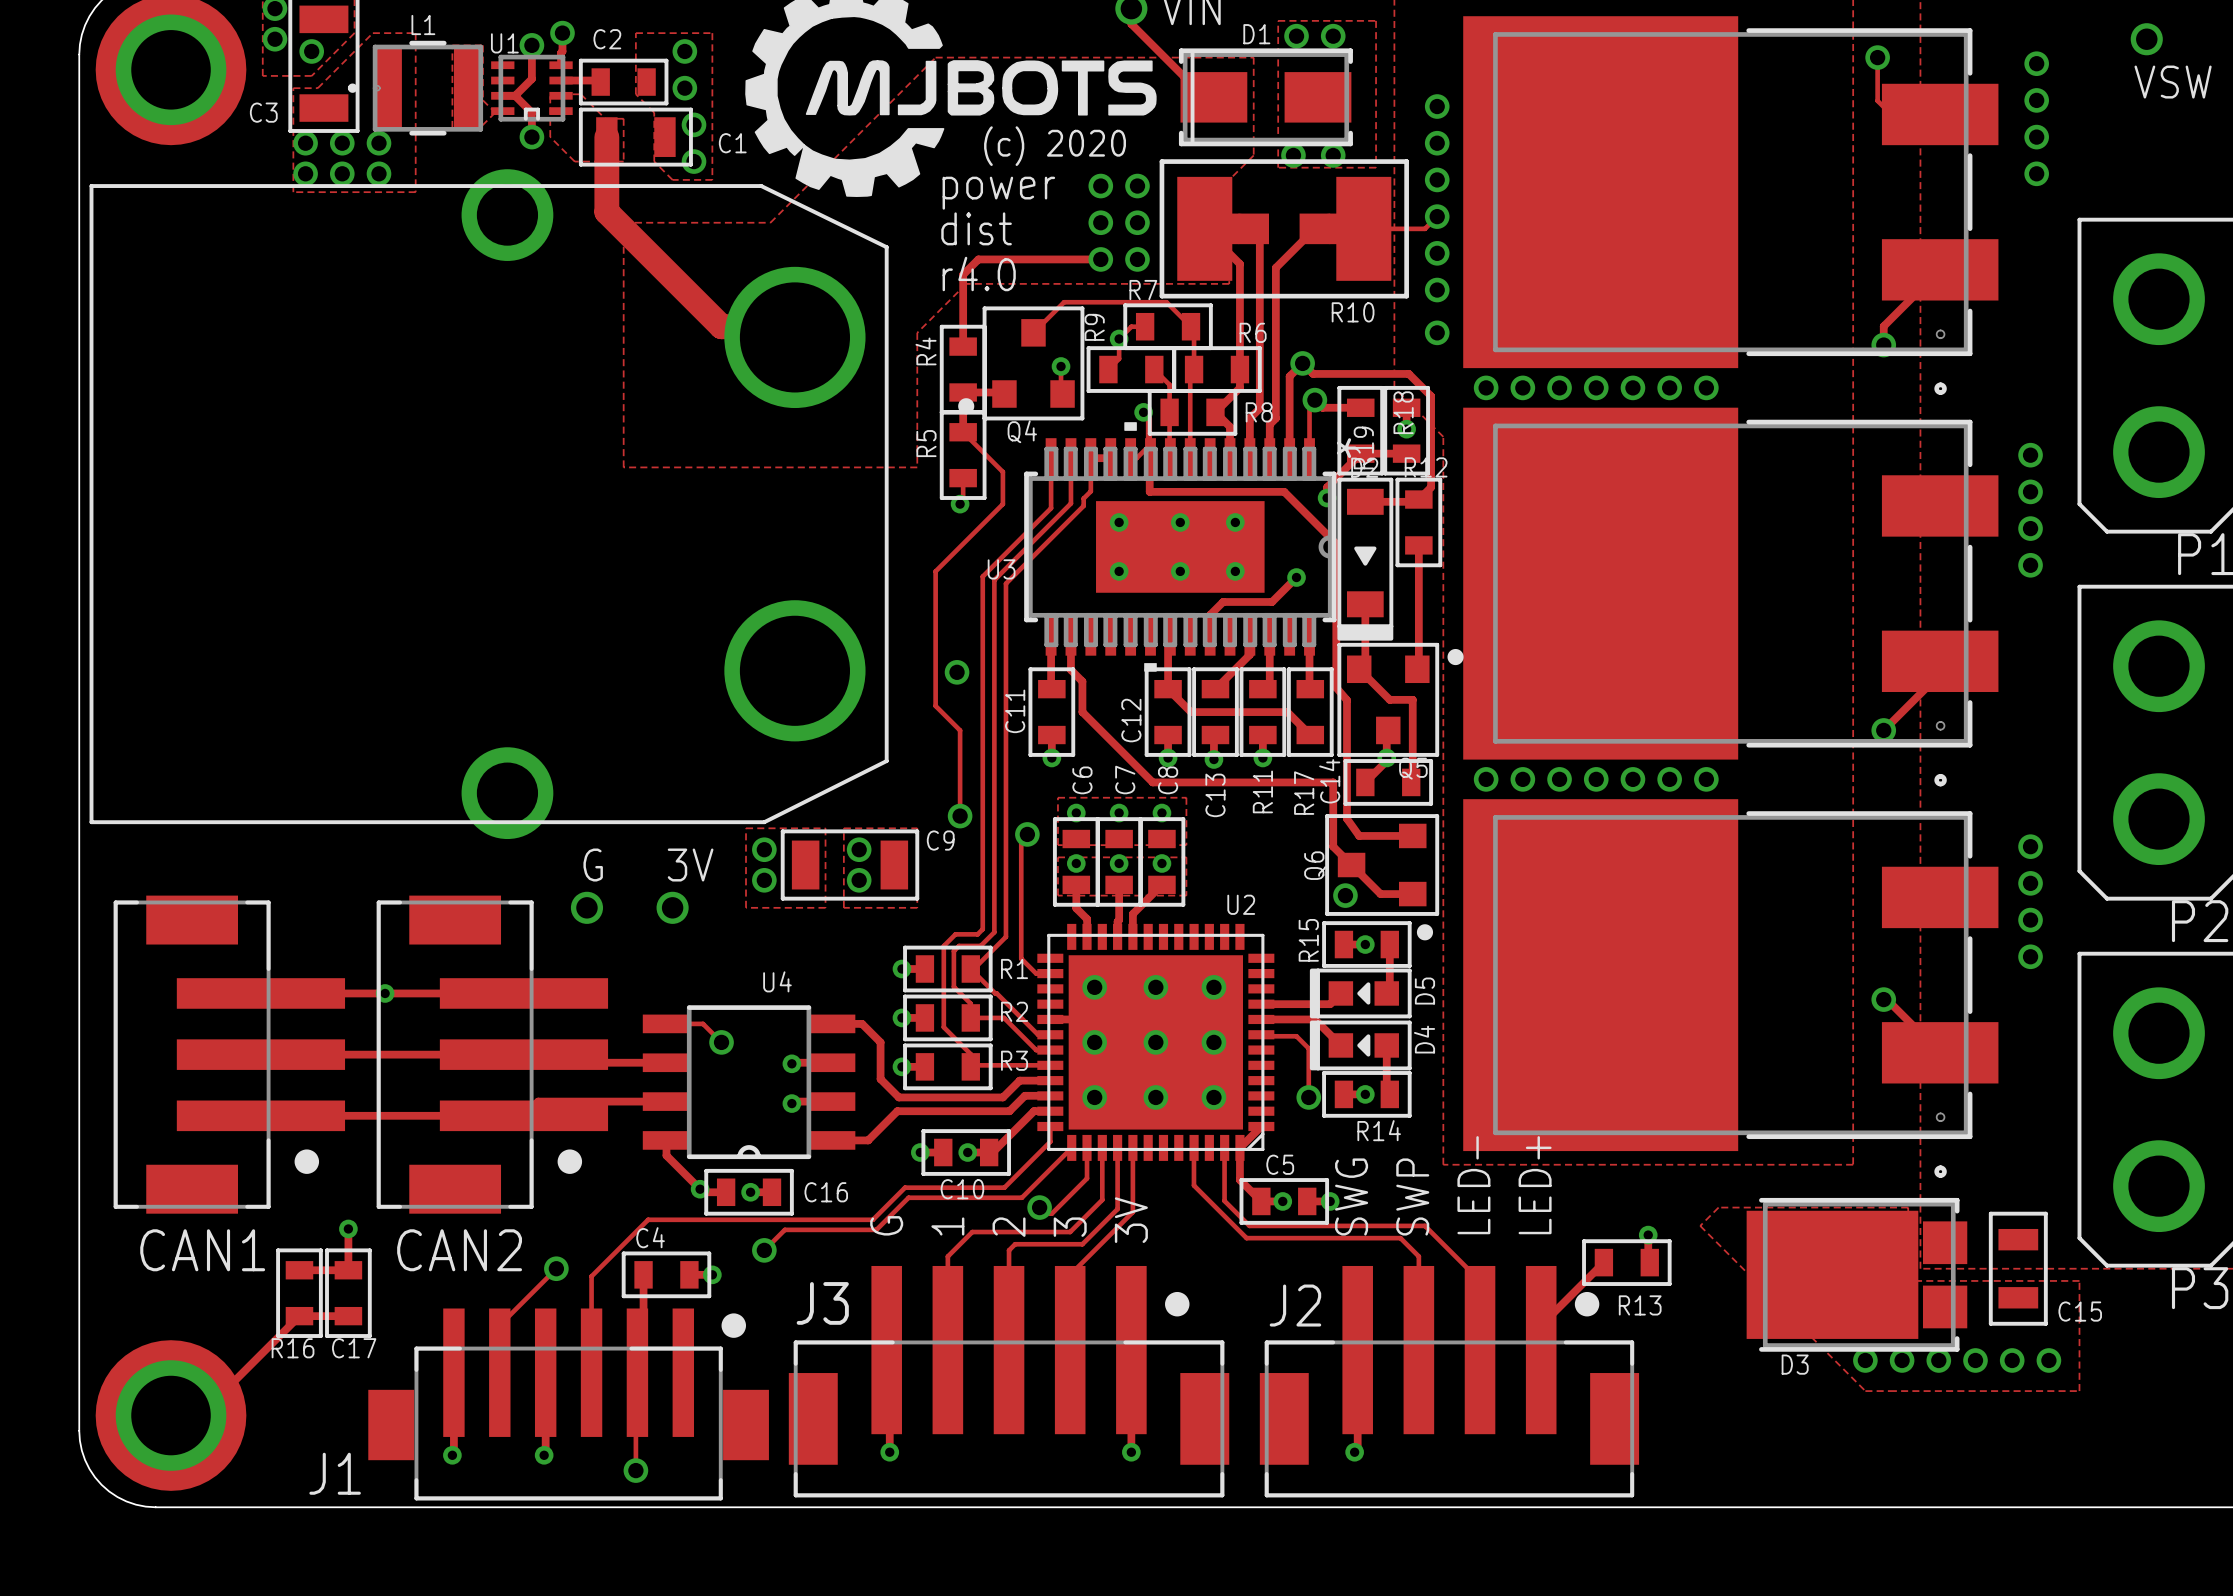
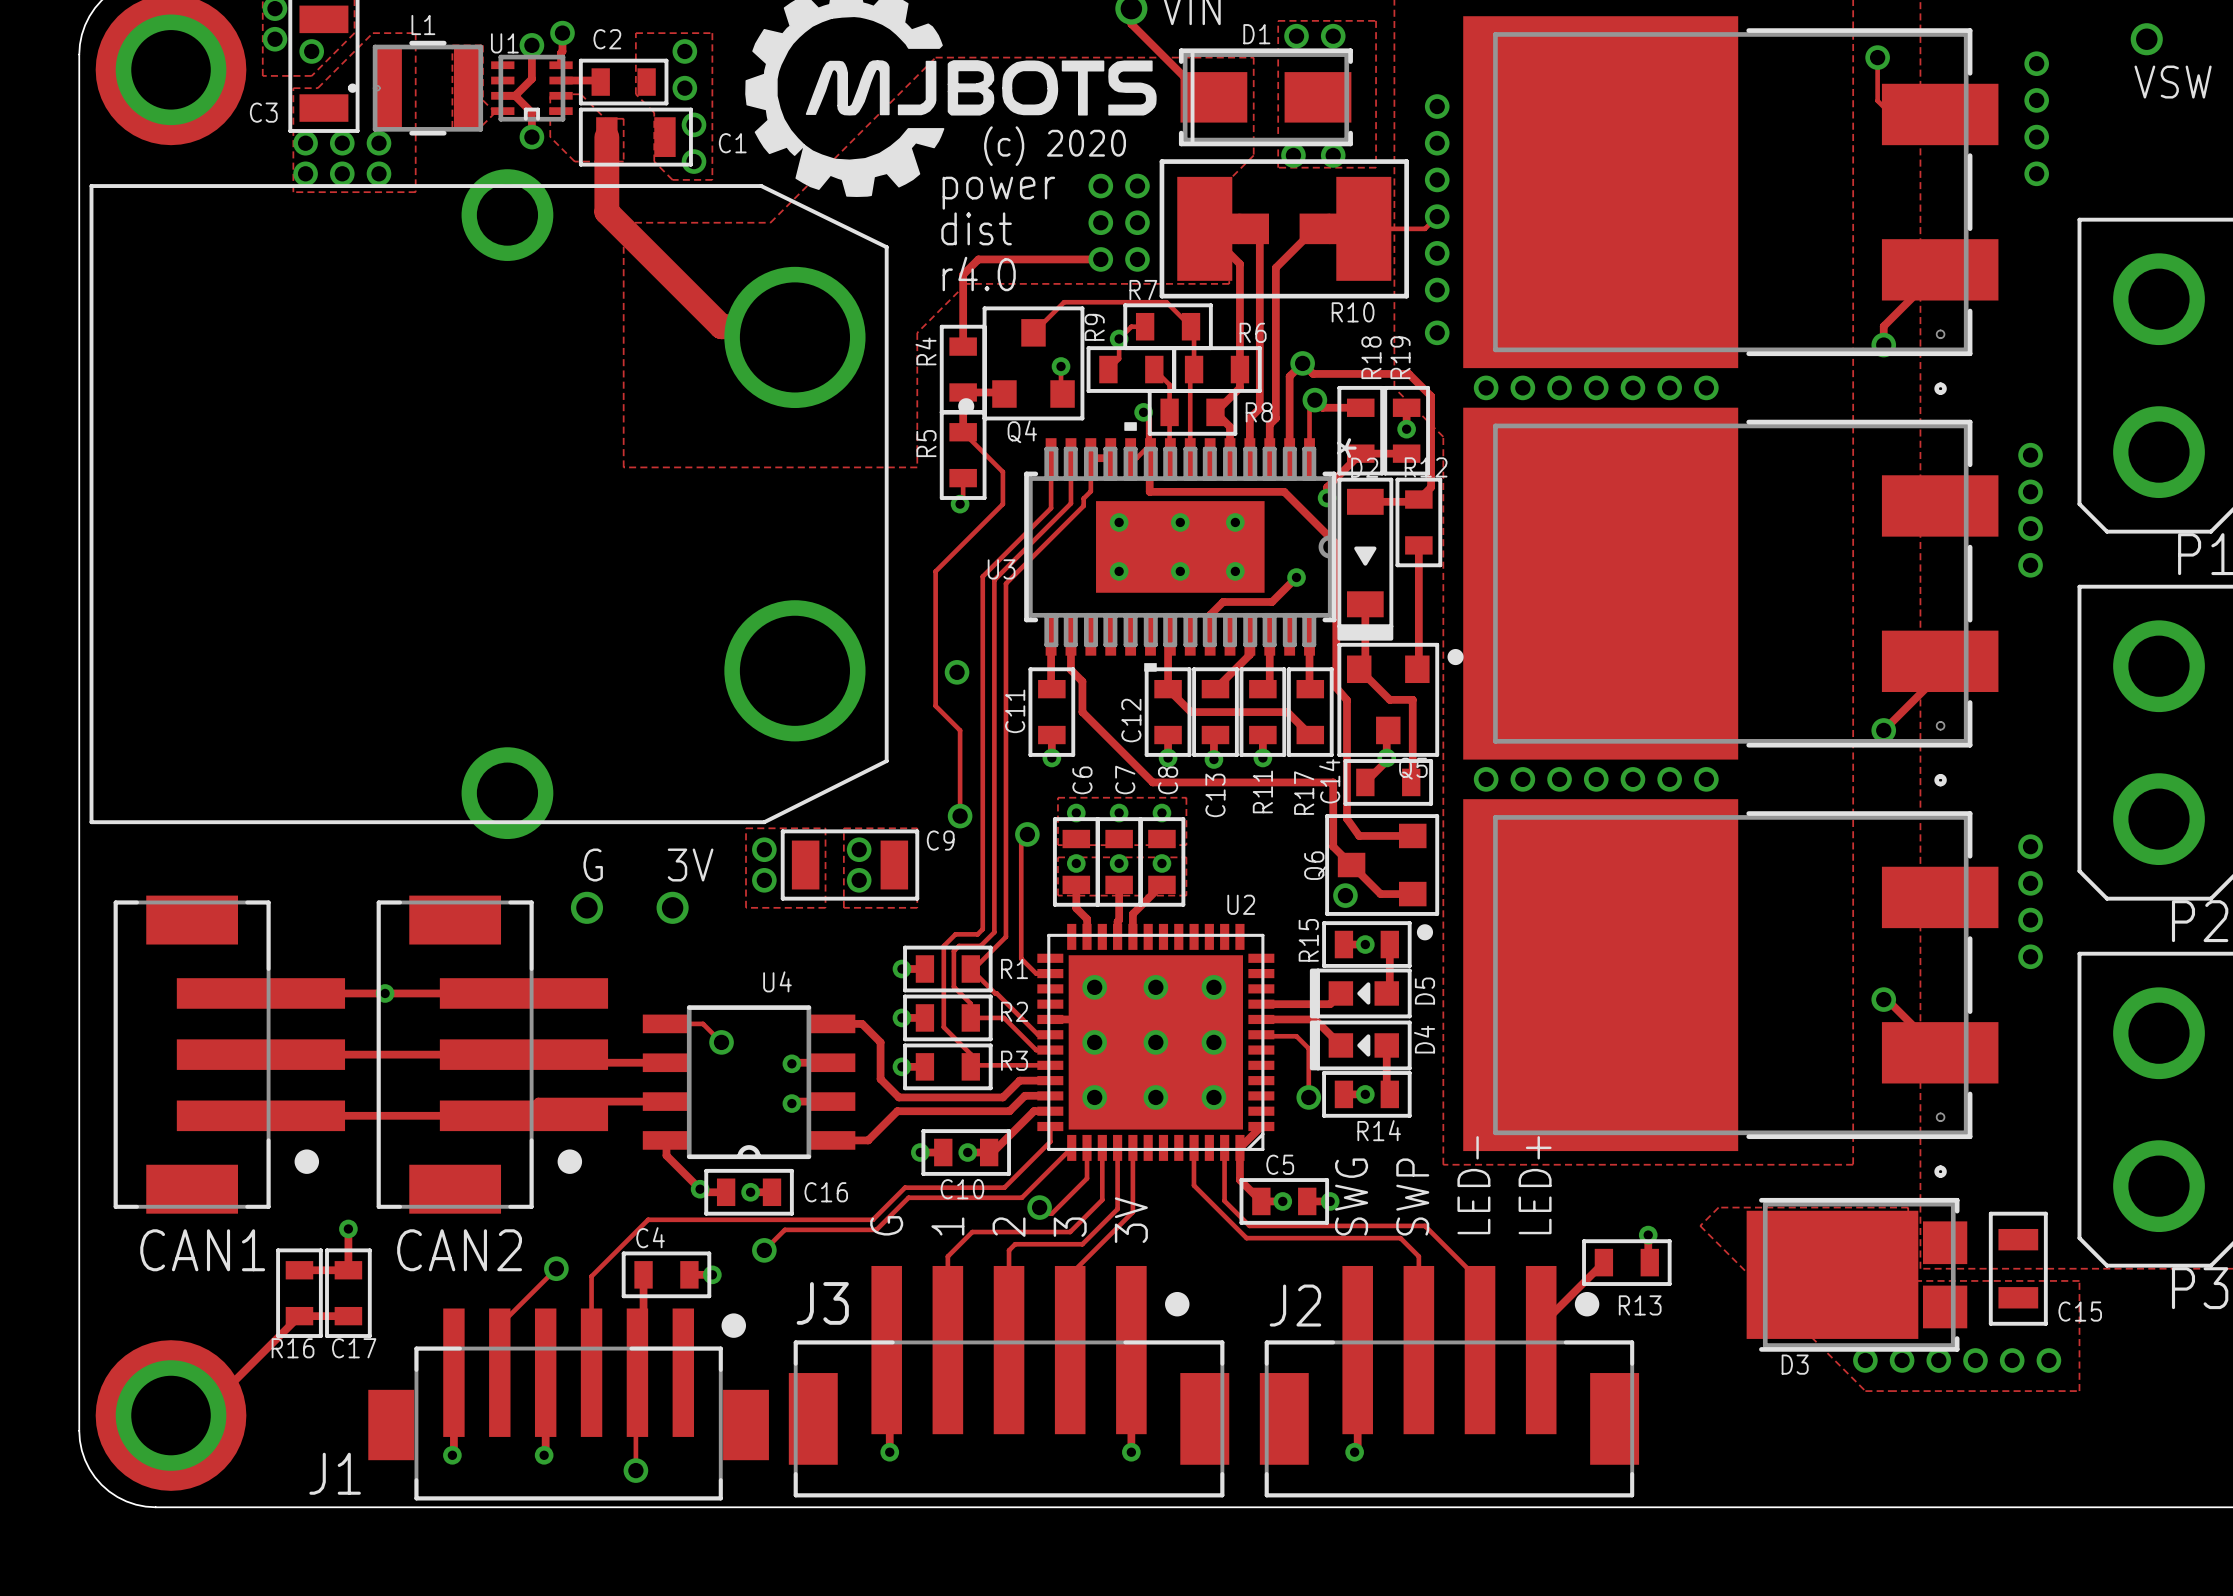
R18 name position: R18 (1403, 412) -> R18 (1371, 357)
R19 name position: R19 (1363, 447) -> R19 (1400, 357)

